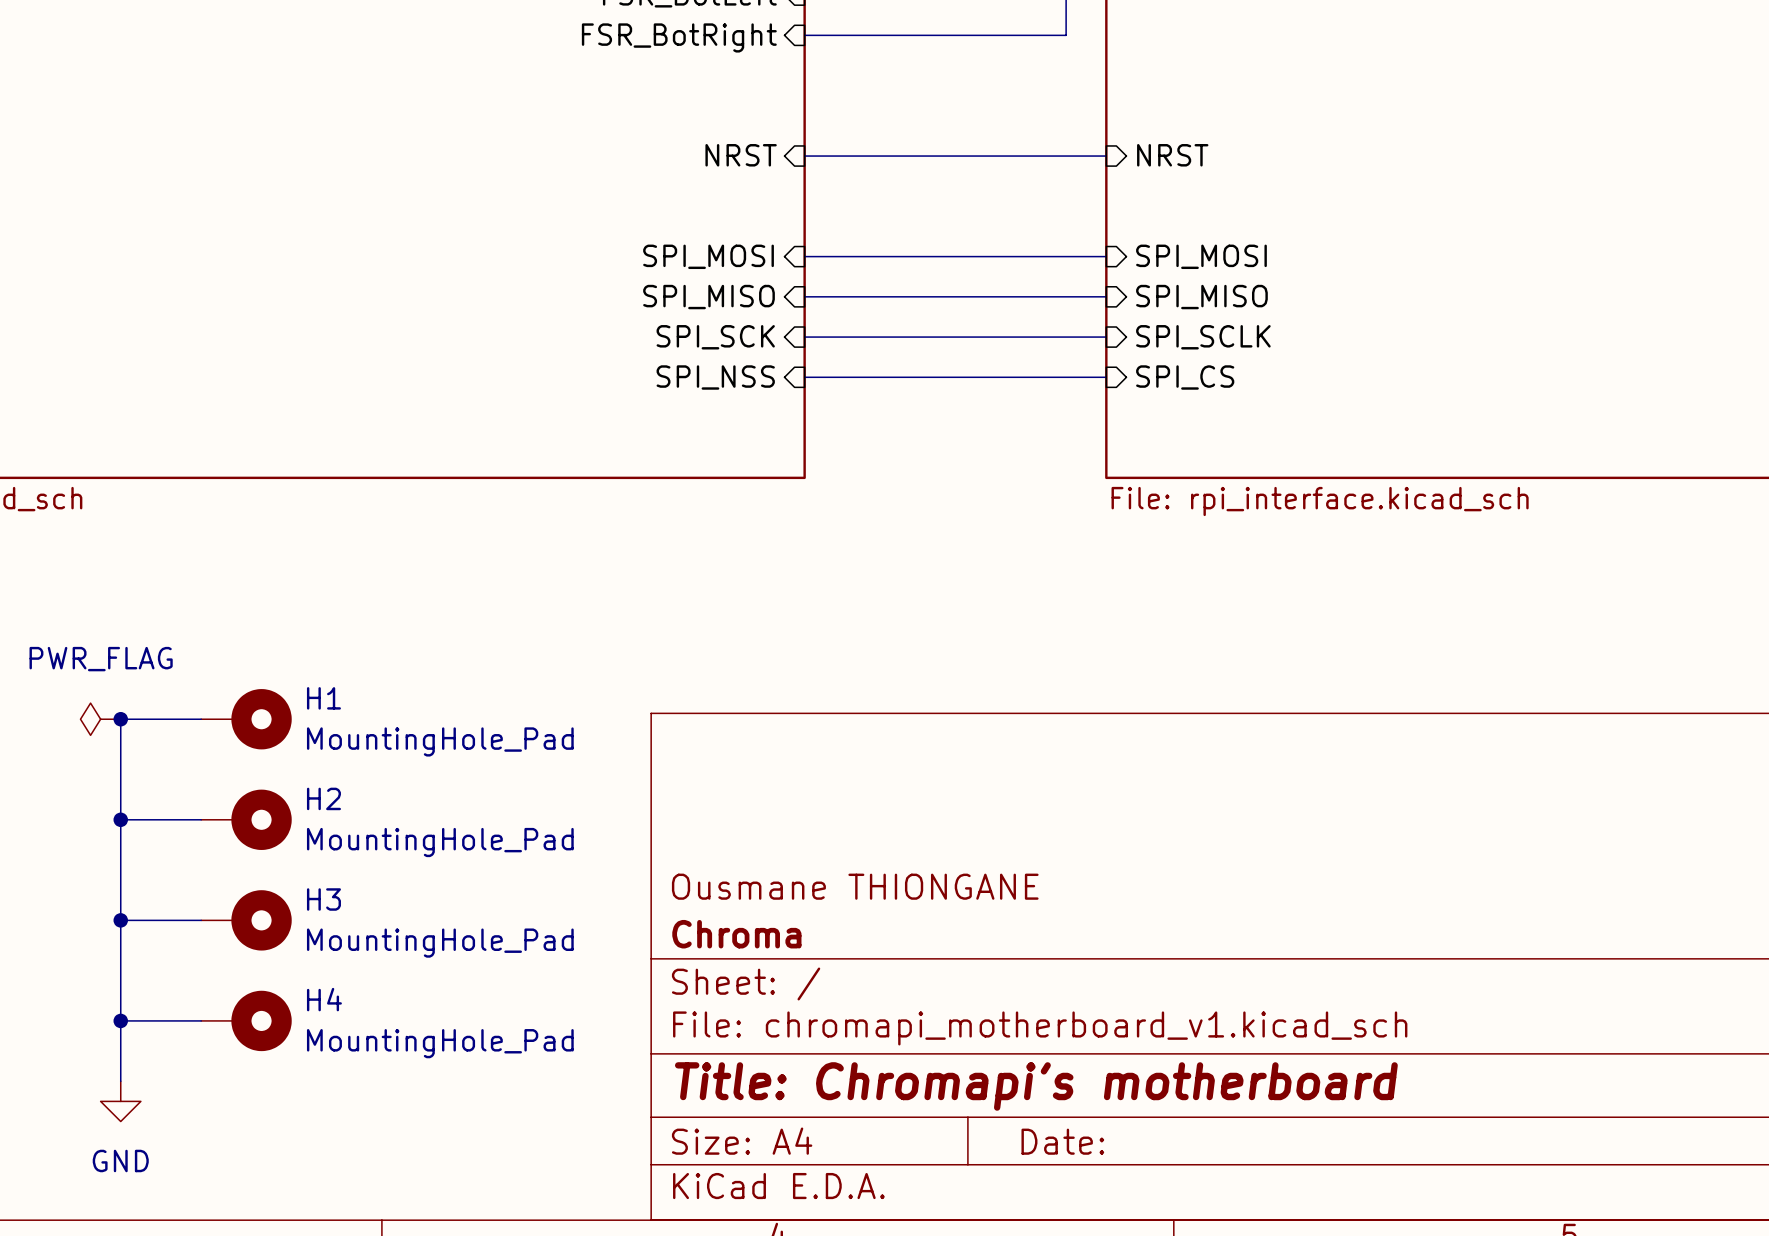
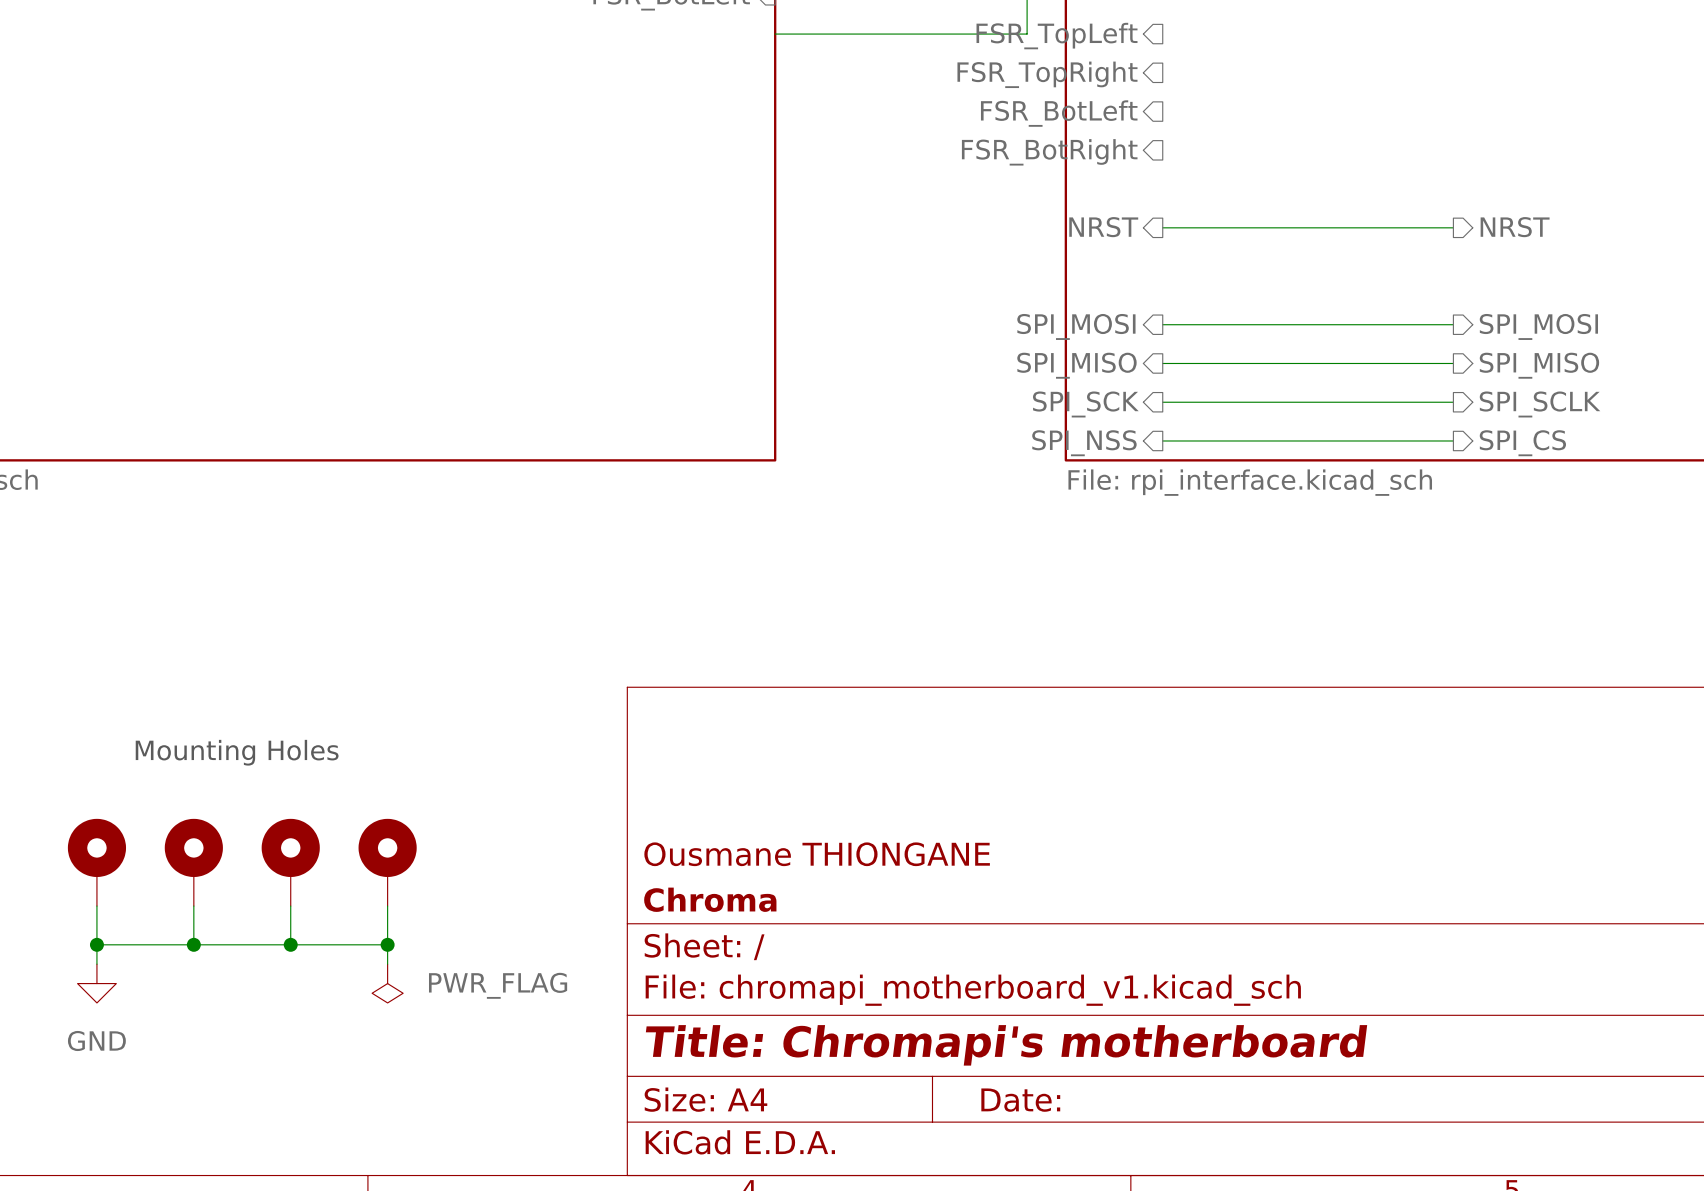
sheet pin: FSR_BotRight (679, 37) -> none
sheet pin: none -> FSR_TopLeft (1057, 36)
sheet pin: none -> FSR_TopRight (1047, 74)
sheet pin: none -> FSR_BotLeft (1059, 113)
sheet pin: NRST (741, 155) -> none
sheet pin rotation: 0° (1172, 155) -> 180° (1103, 227)
wire: (804, 156) (1106, 156) -> none
sheet pin: none -> FSR_BotRight (1049, 152)
sheet pin: none -> NRST (1515, 227)
wire: none -> (1162, 227) (1453, 227)
sheet pin: SPI_MOSI (708, 256) -> none
wire: (804, 256) (1106, 256) -> none
sheet pin rotation: 0° (1201, 256) -> 180° (1076, 326)
wire: (804, 296) (1106, 296) -> none
sheet pin: SPI_MISO (709, 297) -> none
sheet pin rotation: 0° (1201, 297) -> 180° (1076, 365)
sheet pin: SPI_SCK (715, 337) -> none
wire: (804, 337) (1106, 337) -> none
sheet pin: SPI_SCLK (1203, 337) -> none
wire: none -> (1162, 324) (1453, 324)
sheet pin: none -> SPI_MOSI (1538, 326)
sheet pin: SPI_NSS (715, 377) -> none
wire: (804, 377) (1106, 377) -> none
sheet pin: SPI_CS (1185, 377) -> SPI_SCK (1085, 404)
wire: none -> (1162, 363) (1453, 363)
sheet pin: none -> SPI_MISO (1539, 365)
wire: none -> (1162, 402) (1453, 402)
sheet pin: none -> SPI_SCLK (1540, 404)
sheet pin: none -> SPI_NSS (1084, 443)
wire: none -> (1162, 440) (1453, 440)
sheet pin: none -> SPI_CS (1522, 443)
power symbol: PWR_FLAG (100, 719) -> none
junction: (120, 719) -> none
wire: (201, 719) (120, 719) (120, 1081) -> none
H1: MountingHole_Pad (246, 719) -> none
text: none -> Mounting Holes (237, 752)
wire: (120, 819) (201, 819) -> none
junction: (120, 819) -> none
H2: MountingHole_Pad (246, 819) -> none
part: none -> (96, 862)
part: none -> (193, 862)
part: none -> (290, 862)
part: none -> (387, 862)
wire: (120, 920) (201, 920) -> none
junction: (120, 920) -> none
H3: MountingHole_Pad (246, 920) -> none
wire: none -> (96, 906) (96, 964)
wire: none -> (193, 906) (193, 944)
wire: none -> (290, 906) (290, 944)
wire: none -> (387, 906) (387, 964)
wire: none -> (96, 944) (387, 944)
junction: none -> (96, 944)
junction: none -> (193, 944)
junction: none -> (290, 944)
junction: none -> (387, 944)
wire: (120, 1020) (201, 1020) -> none
junction: (120, 1020) -> none
H4: MountingHole_Pad (246, 1020) -> none
power symbol: none -> PWR_FLAG (387, 983)
power symbol position: GND (120, 1101) -> GND (96, 983)

